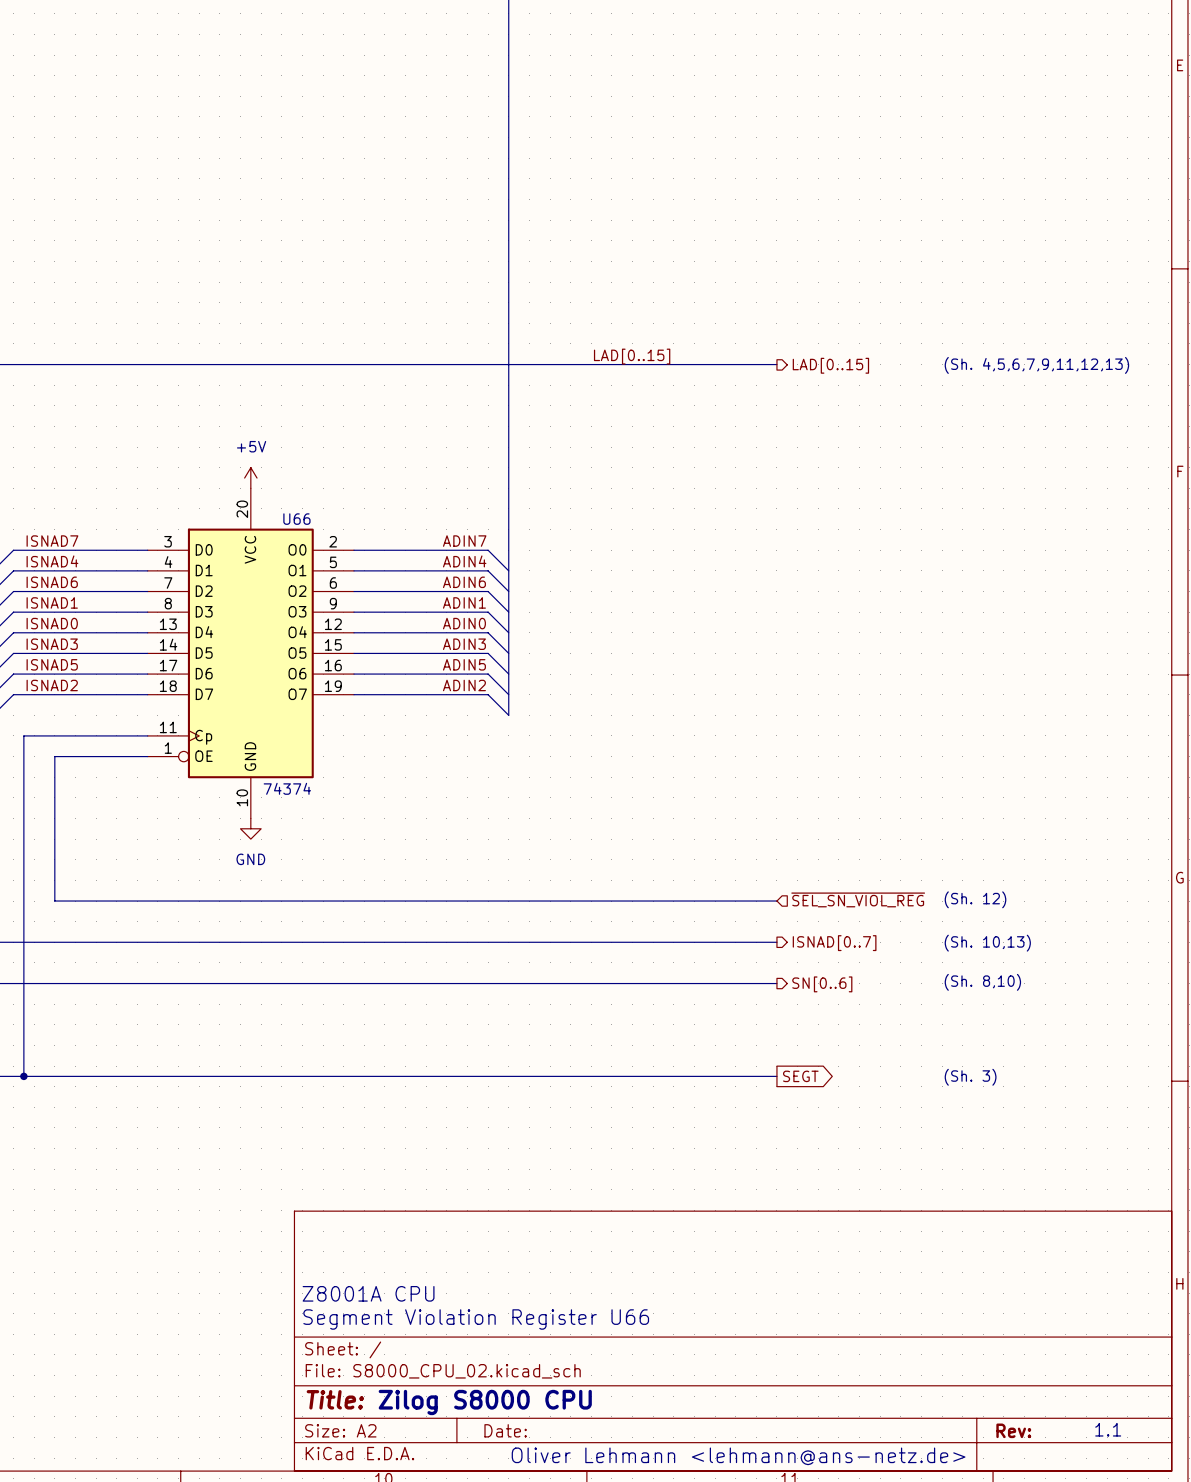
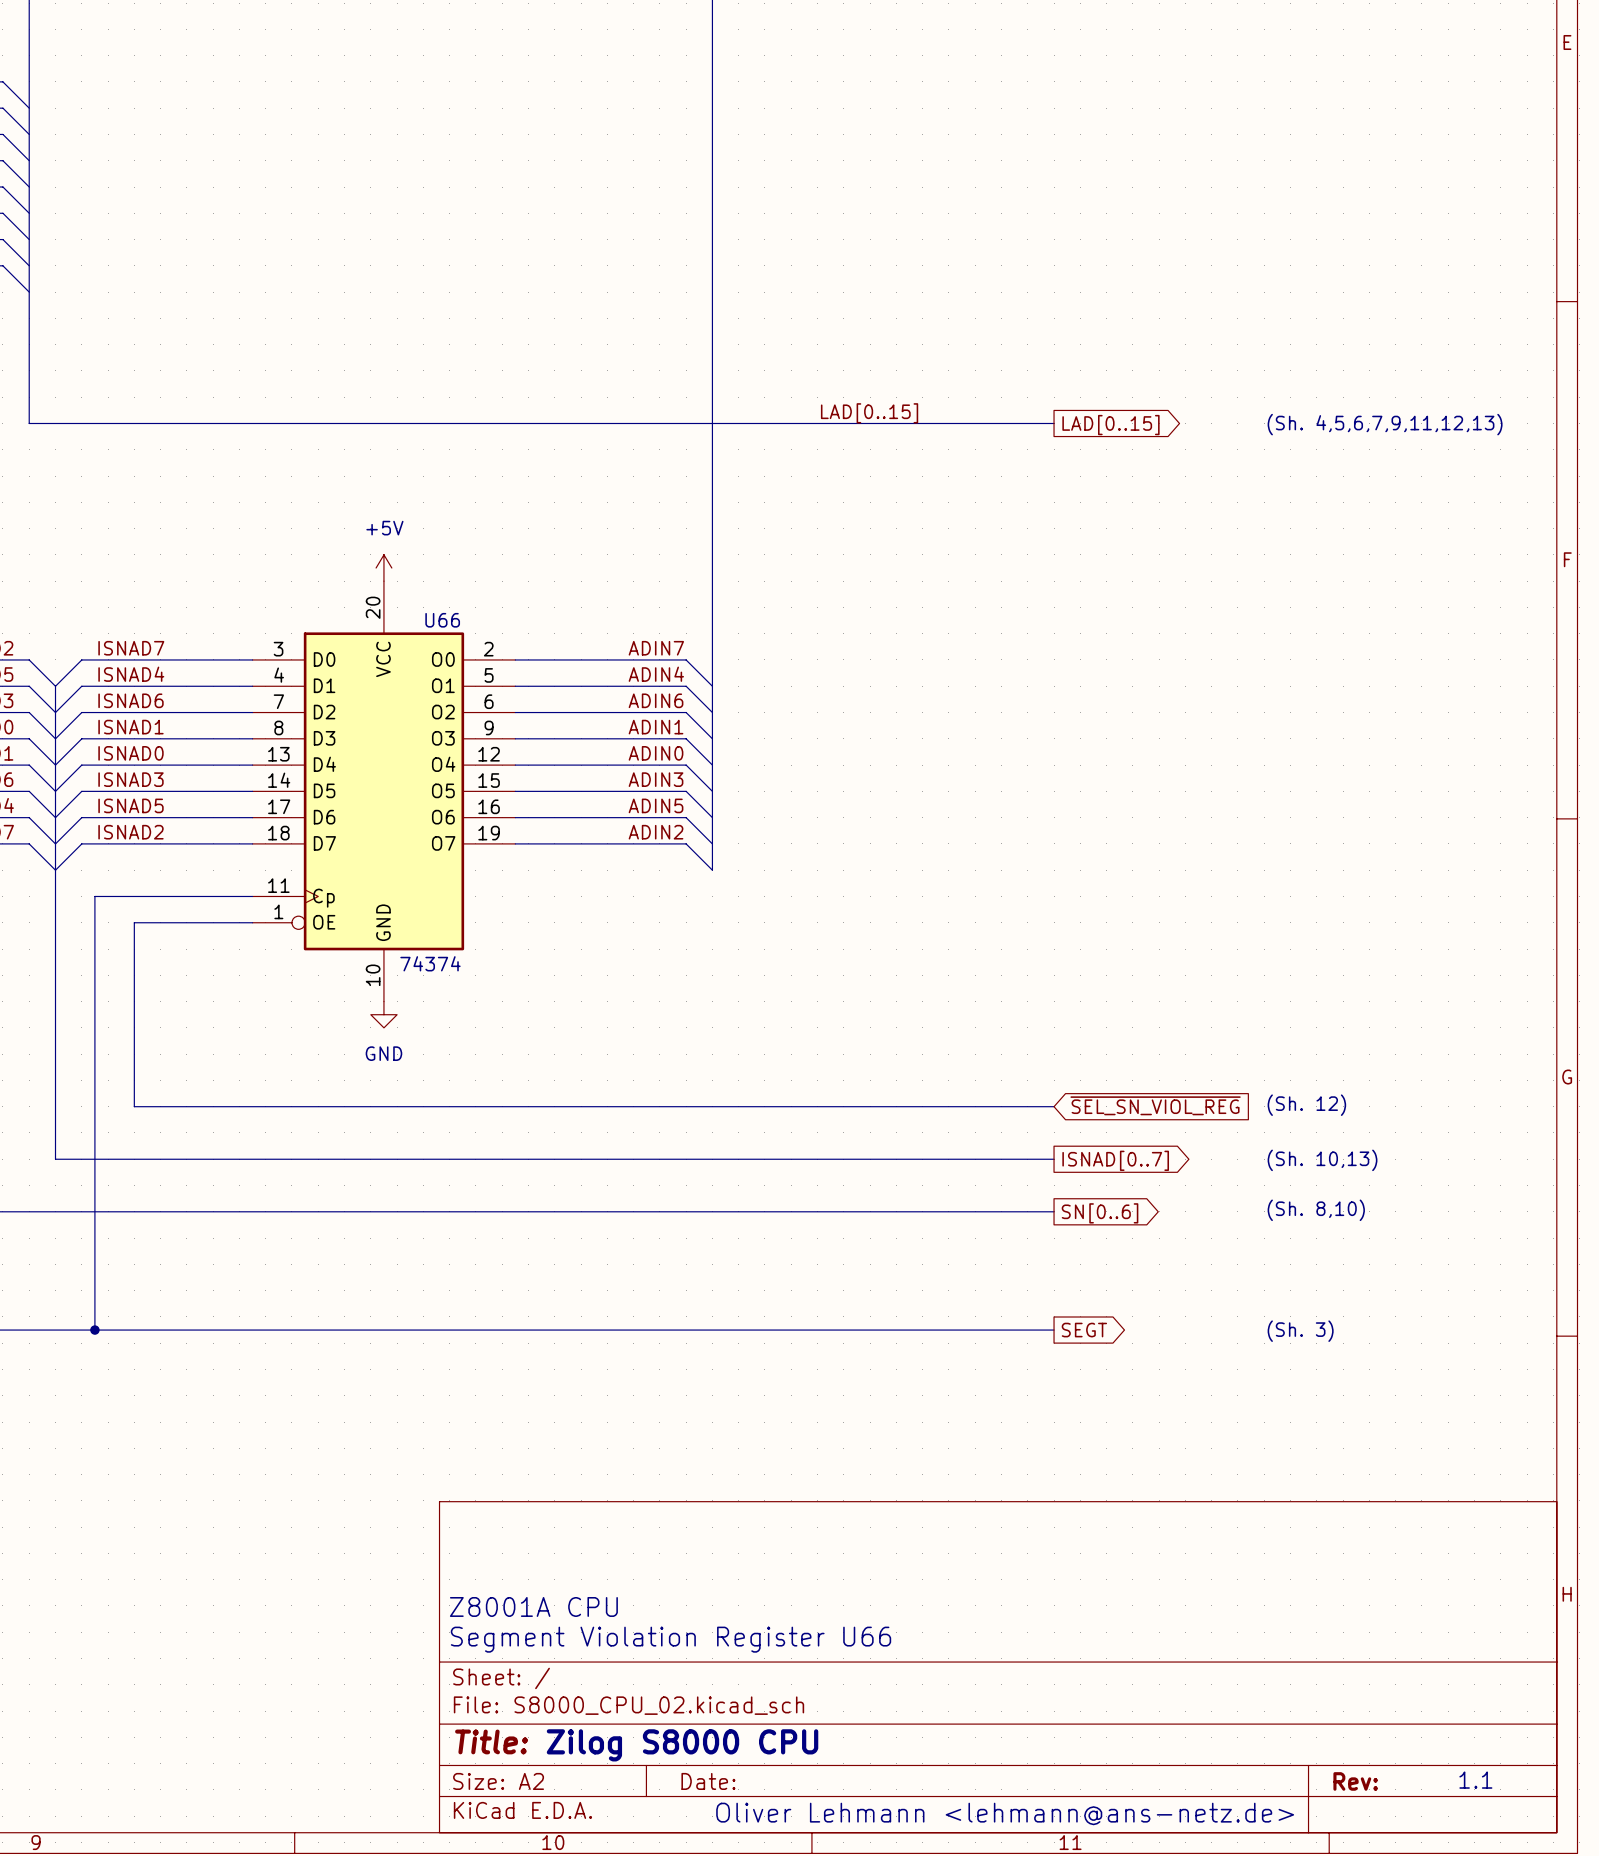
global label: none -> LAD[0..15] (1110, 425)
hierarchical label: LAD[0..15] (830, 365) -> none
hierarchical label: ~{SEL_SN_VIOL_REG} (858, 899) -> none
global label: none -> ~{SEL_SN_VIOL_REG} (1155, 1105)
global label: none -> ISNAD[0..7] (1115, 1160)
hierarchical label: ISNAD[0..7] (834, 943) -> none
global label: none -> SN[0..6] (1100, 1213)
hierarchical label: SN[0..6] (822, 984) -> none

